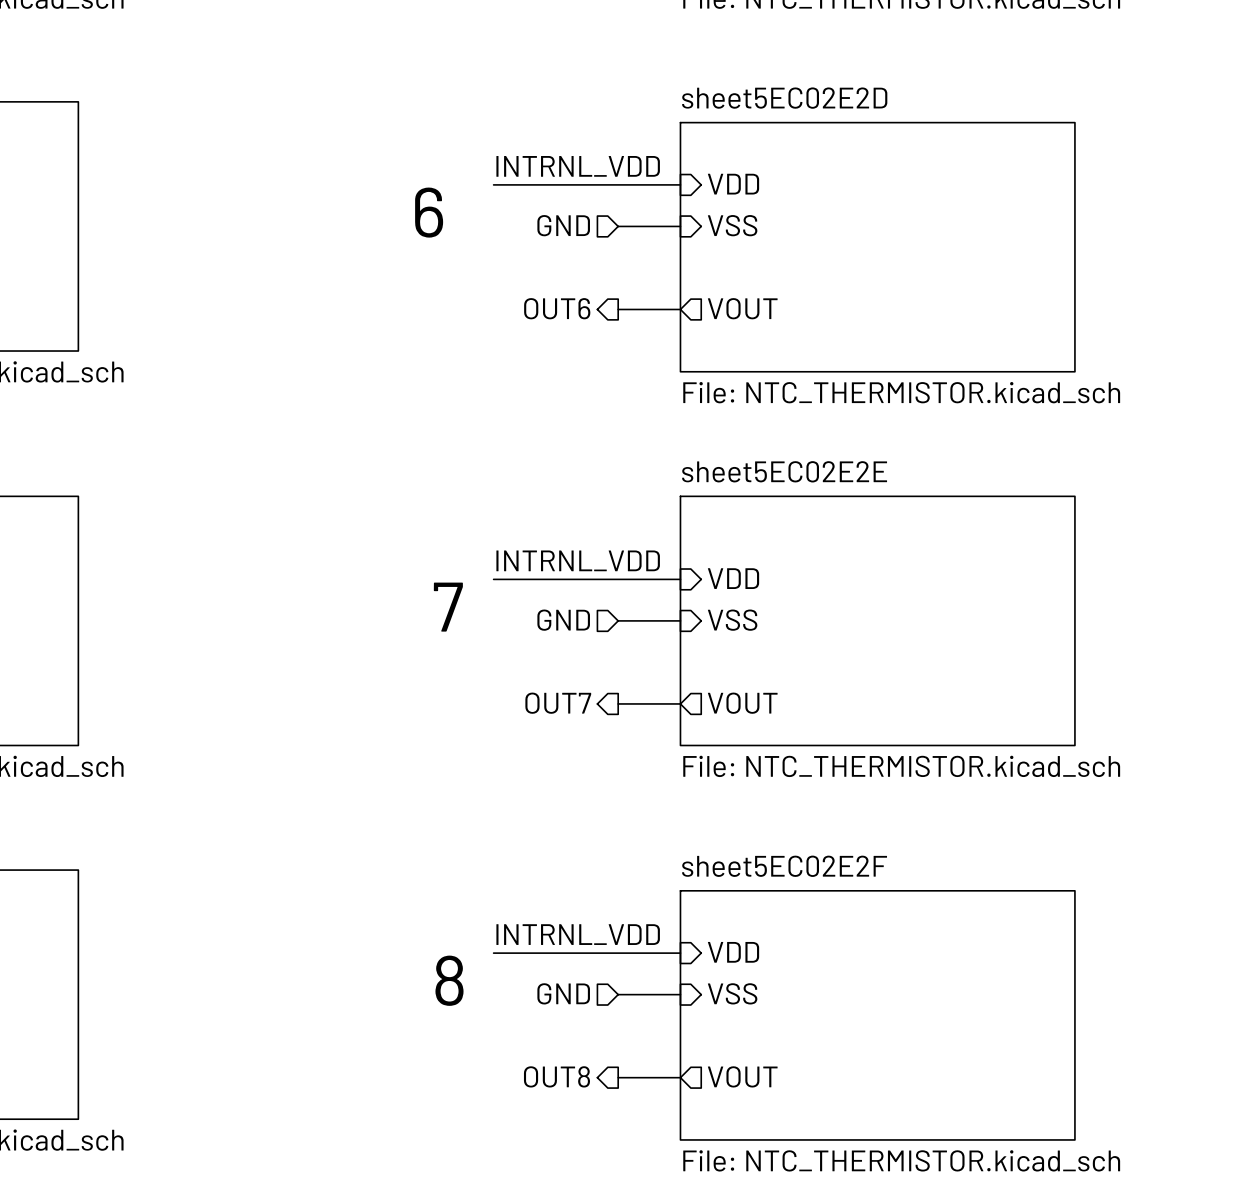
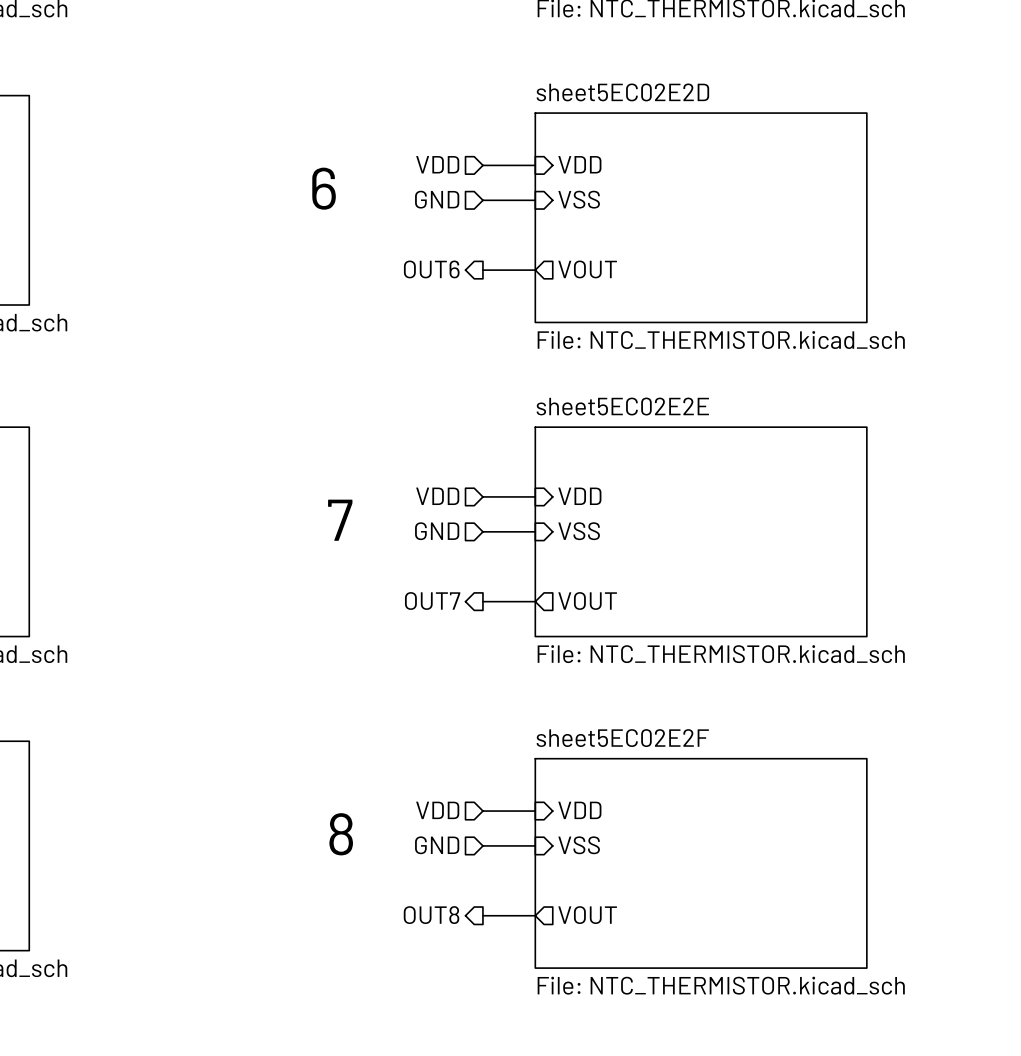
label: INTRNL_VDD (578, 166) -> none
wire: (493, 184) (618, 184) -> none
hierarchical label: none -> VDD (437, 164)
label: INTRNL_VDD (578, 560) -> none
hierarchical label: none -> VDD (437, 496)
wire: (493, 579) (618, 579) -> none
label: INTRNL_VDD (578, 934) -> none
hierarchical label: none -> VDD (437, 810)
wire: (493, 953) (618, 953) -> none

